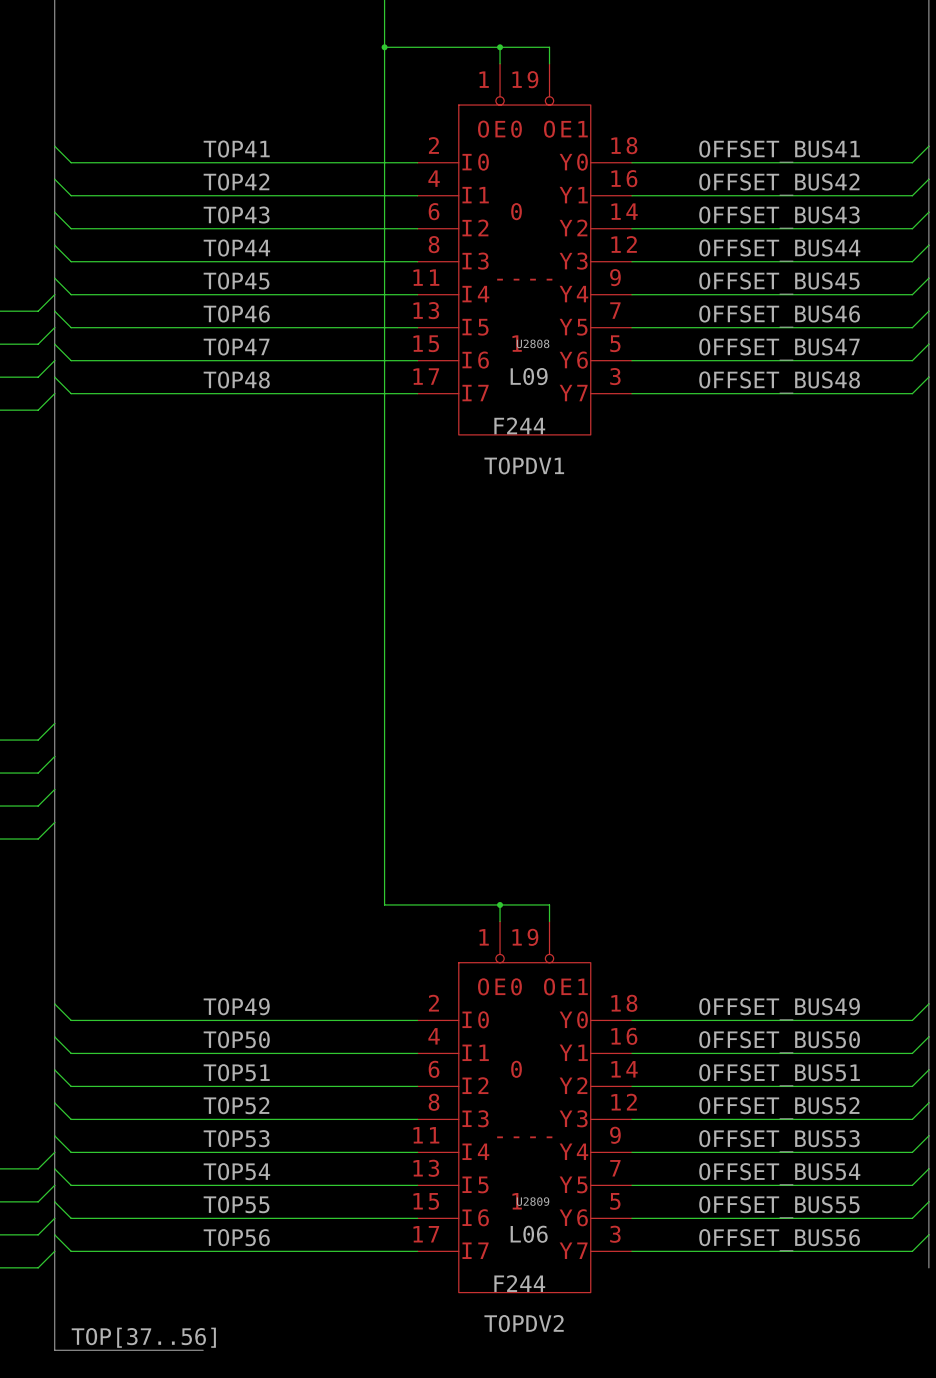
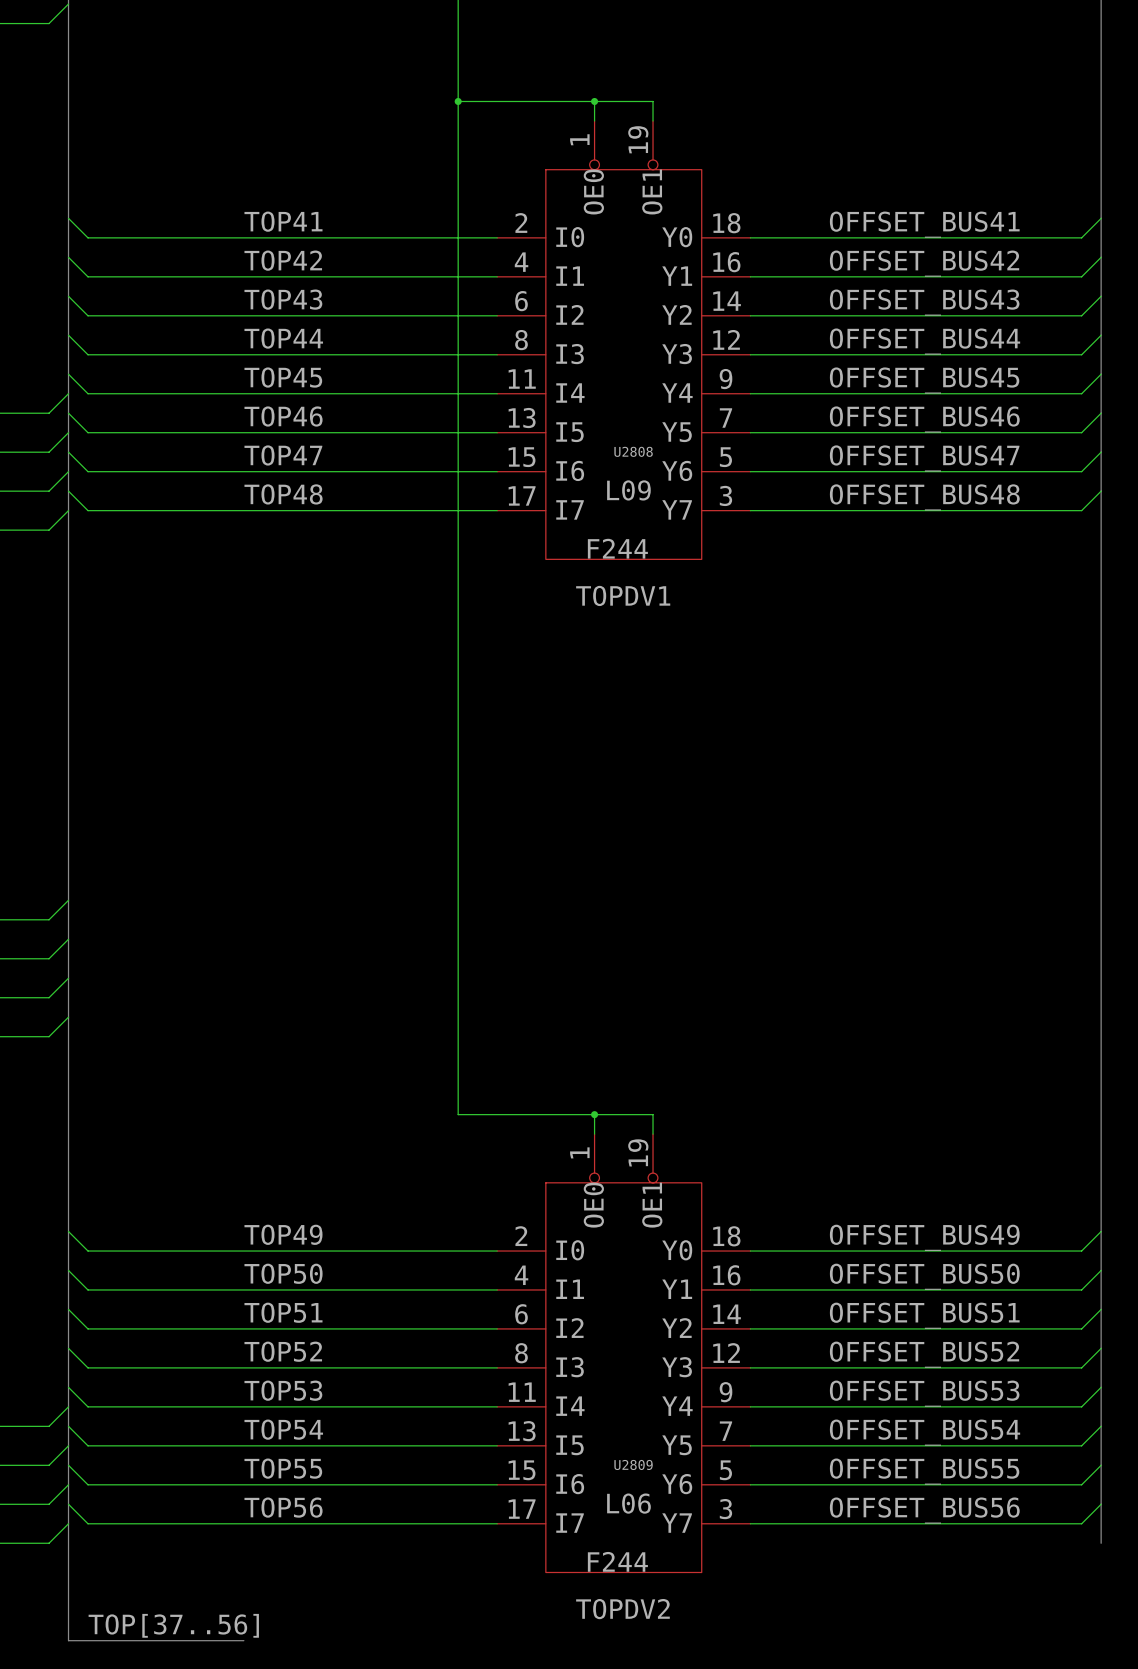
U2808 symbol: [417, 63, 632, 435] -> [497, 120, 751, 560]
U2809 symbol: [417, 921, 632, 1293] -> [497, 1134, 751, 1573]

